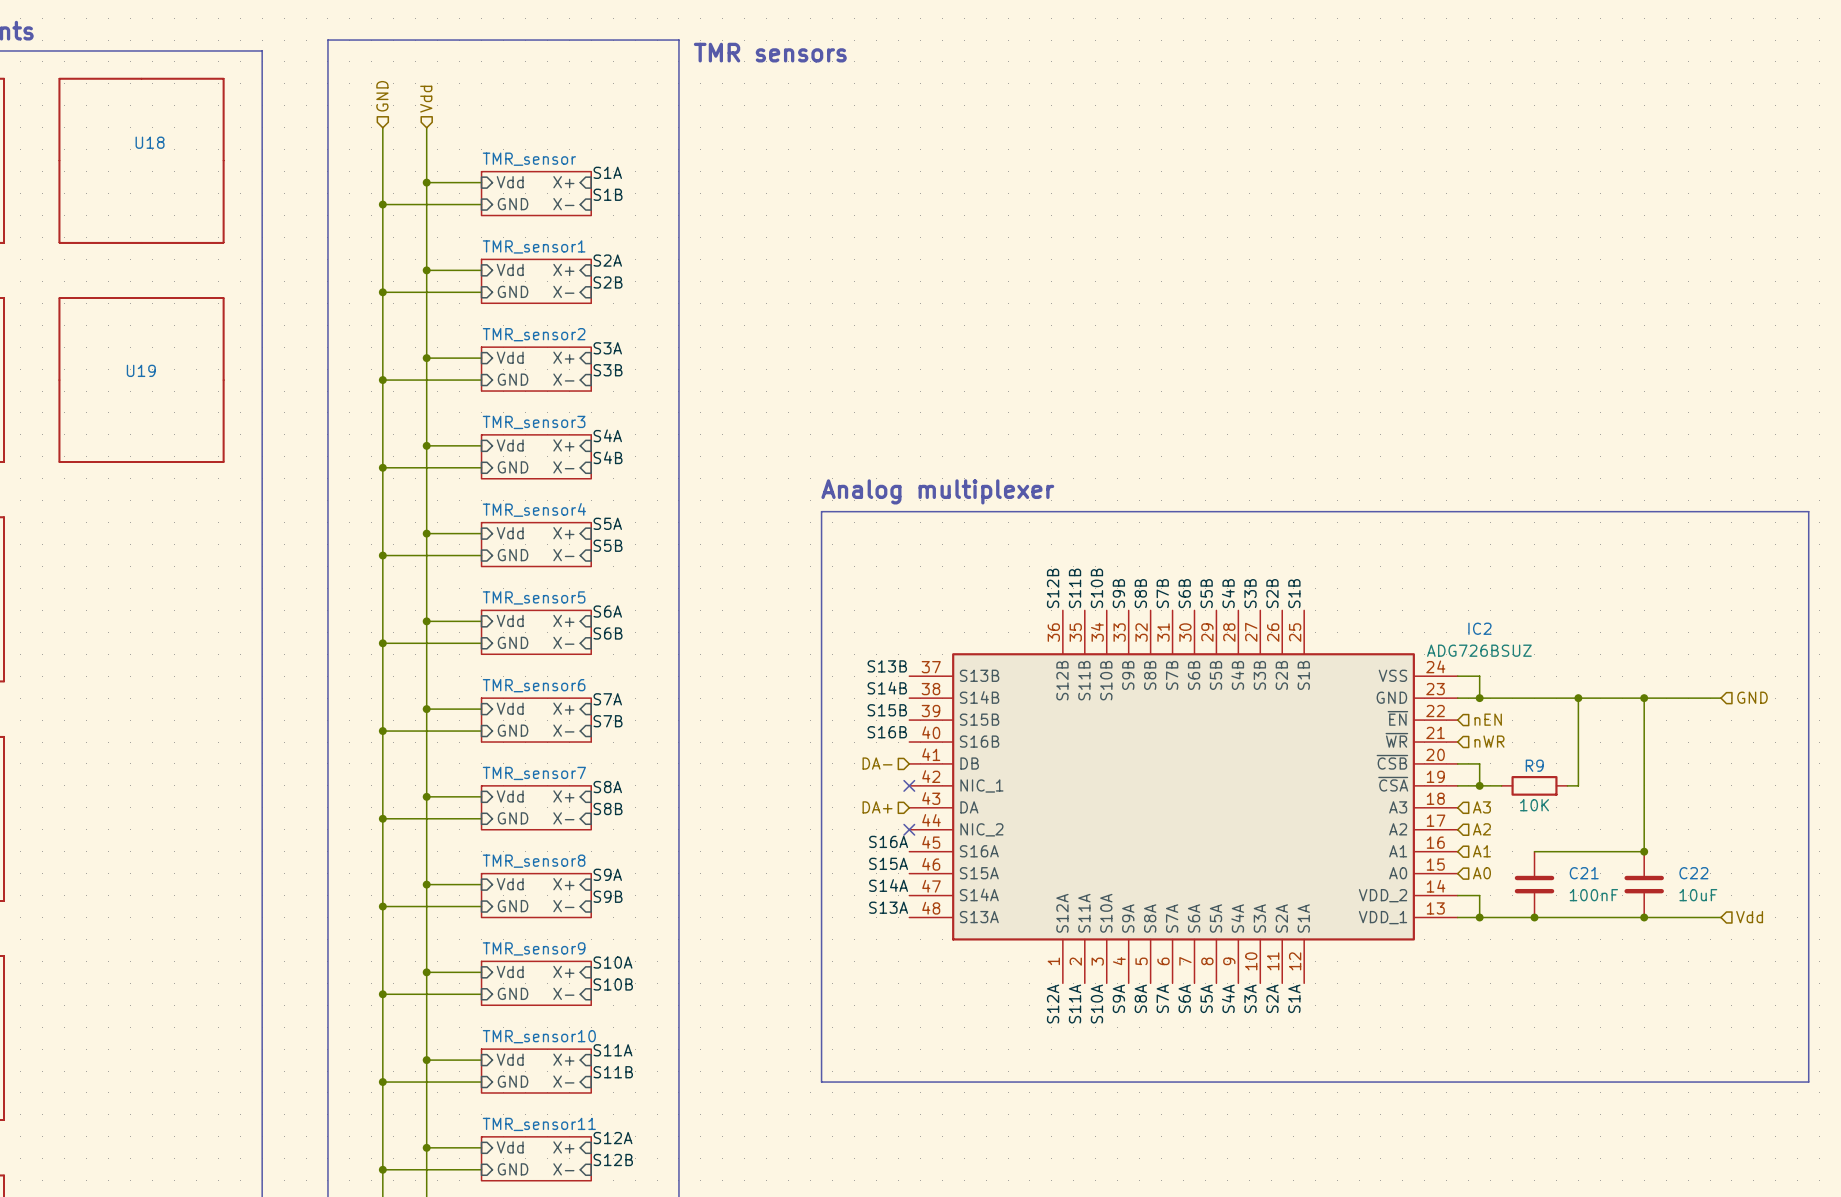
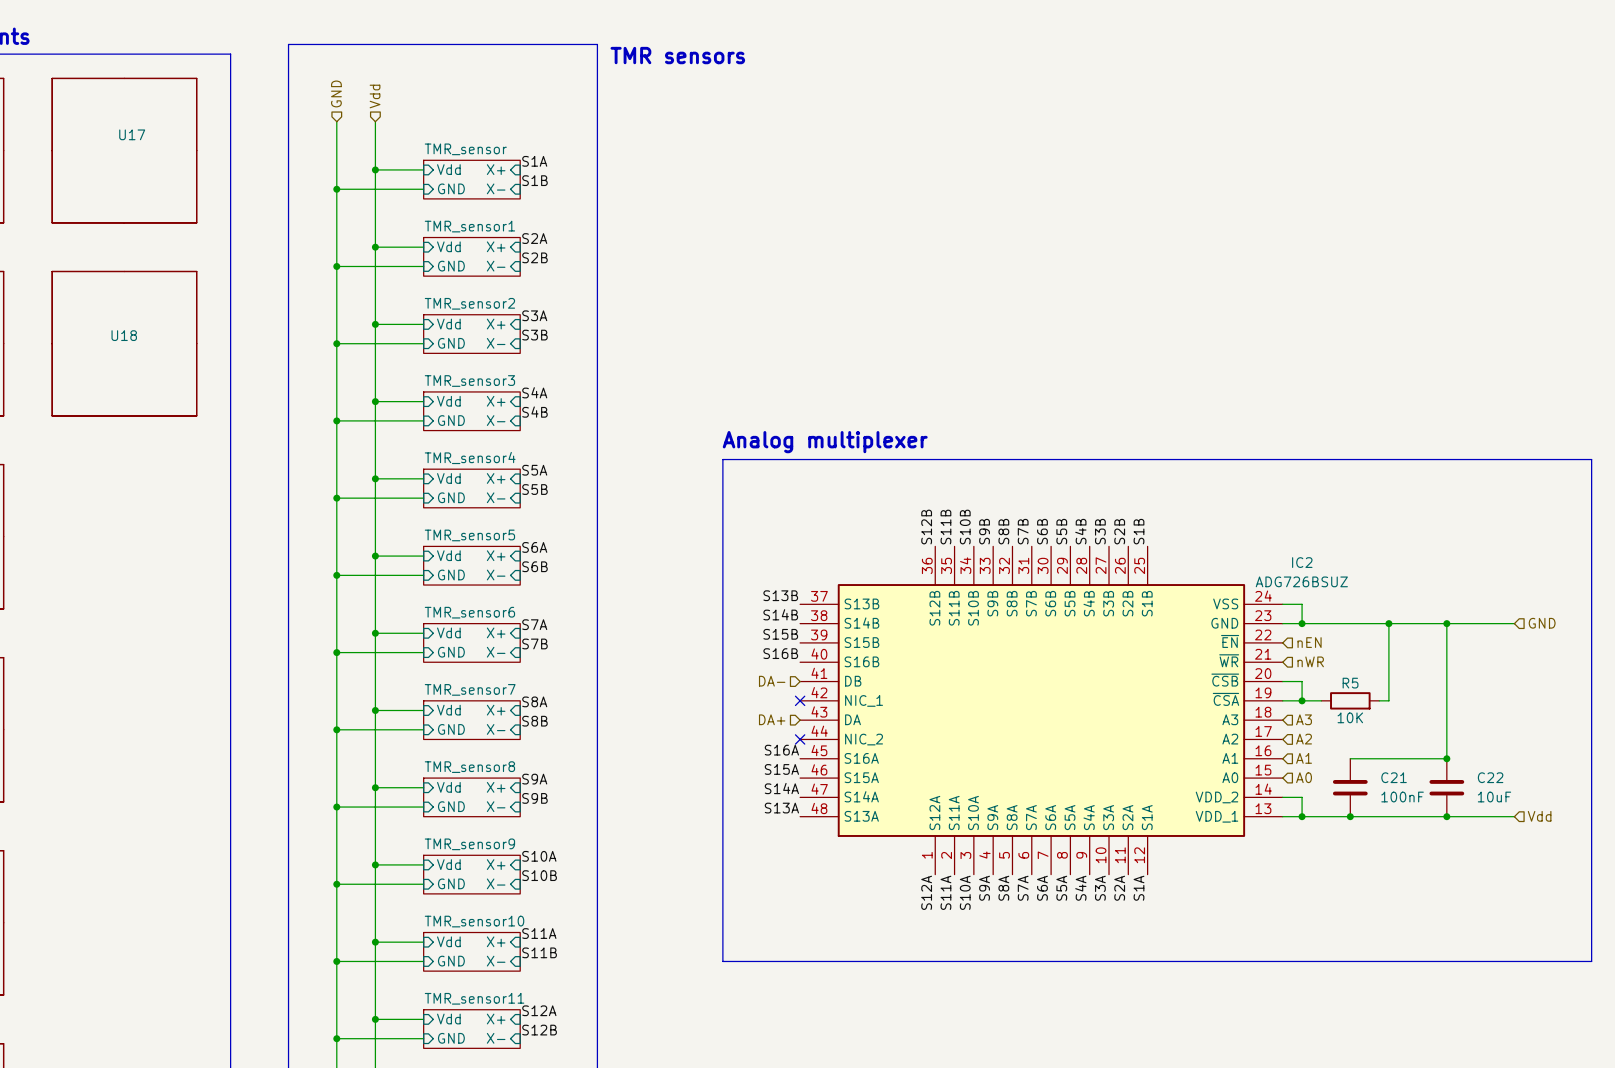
U18 name: U18 (150, 142) -> U17 (132, 134)
U19 name: U19 (141, 370) -> U18 (124, 335)
R9 name: R9 (1534, 765) -> R5 (1350, 683)

